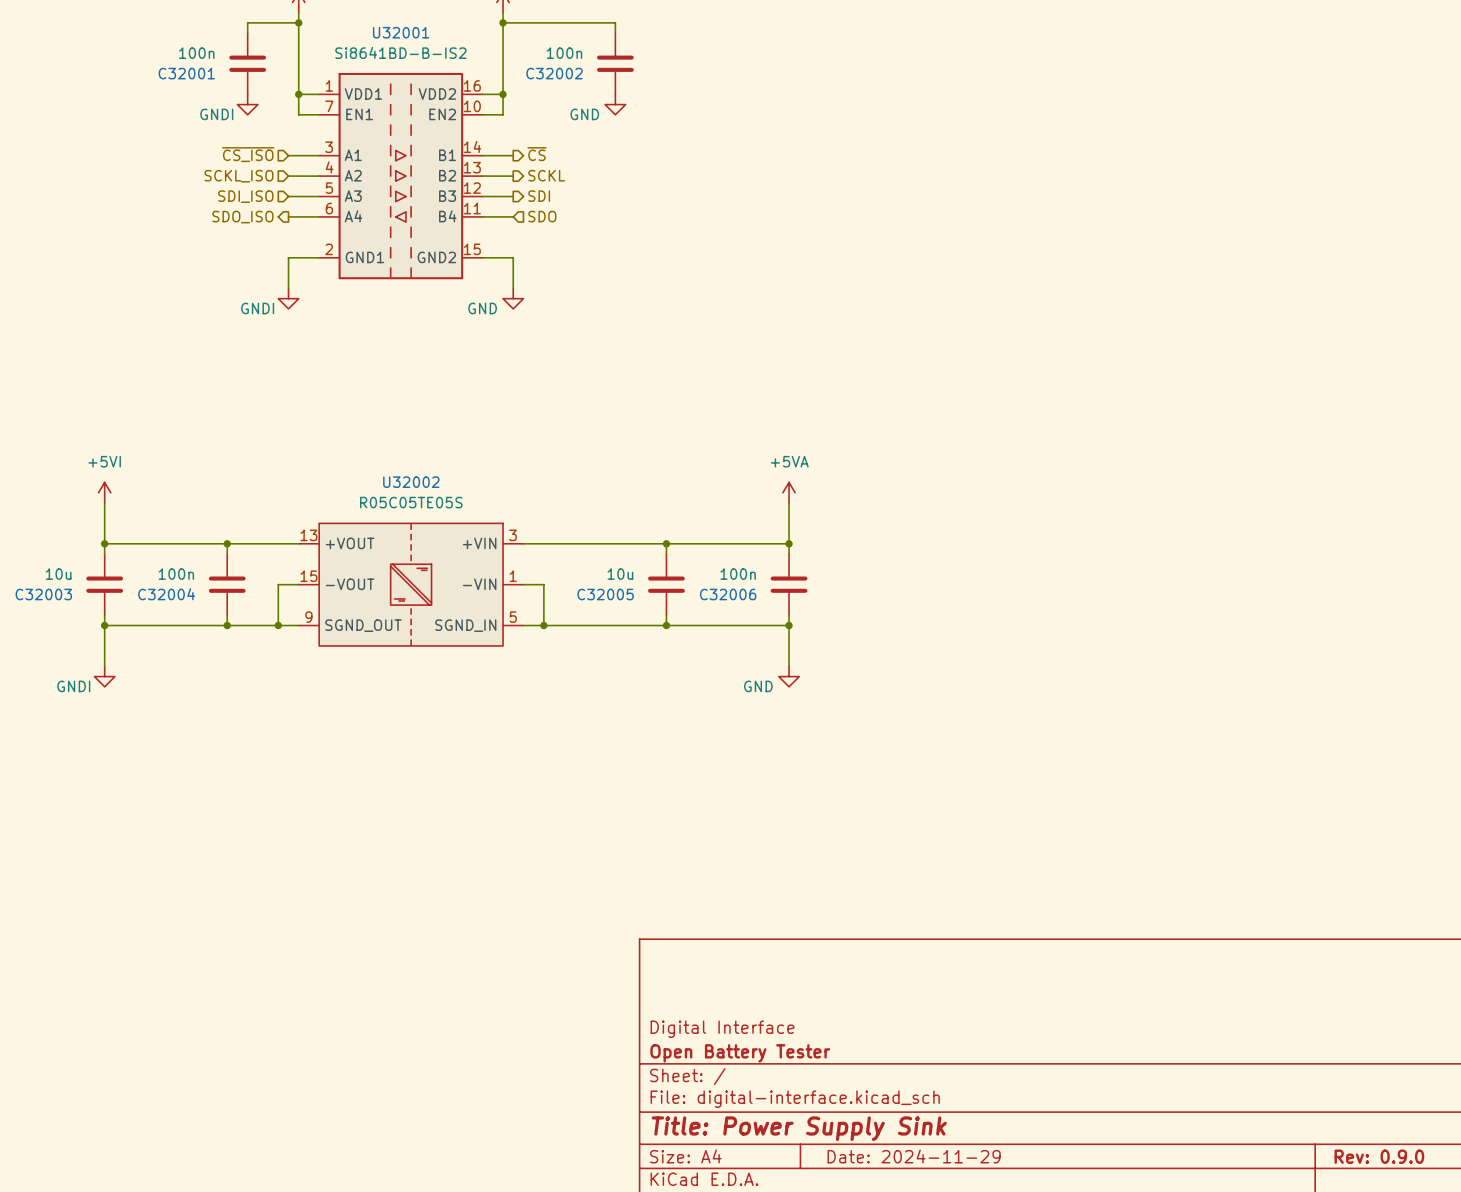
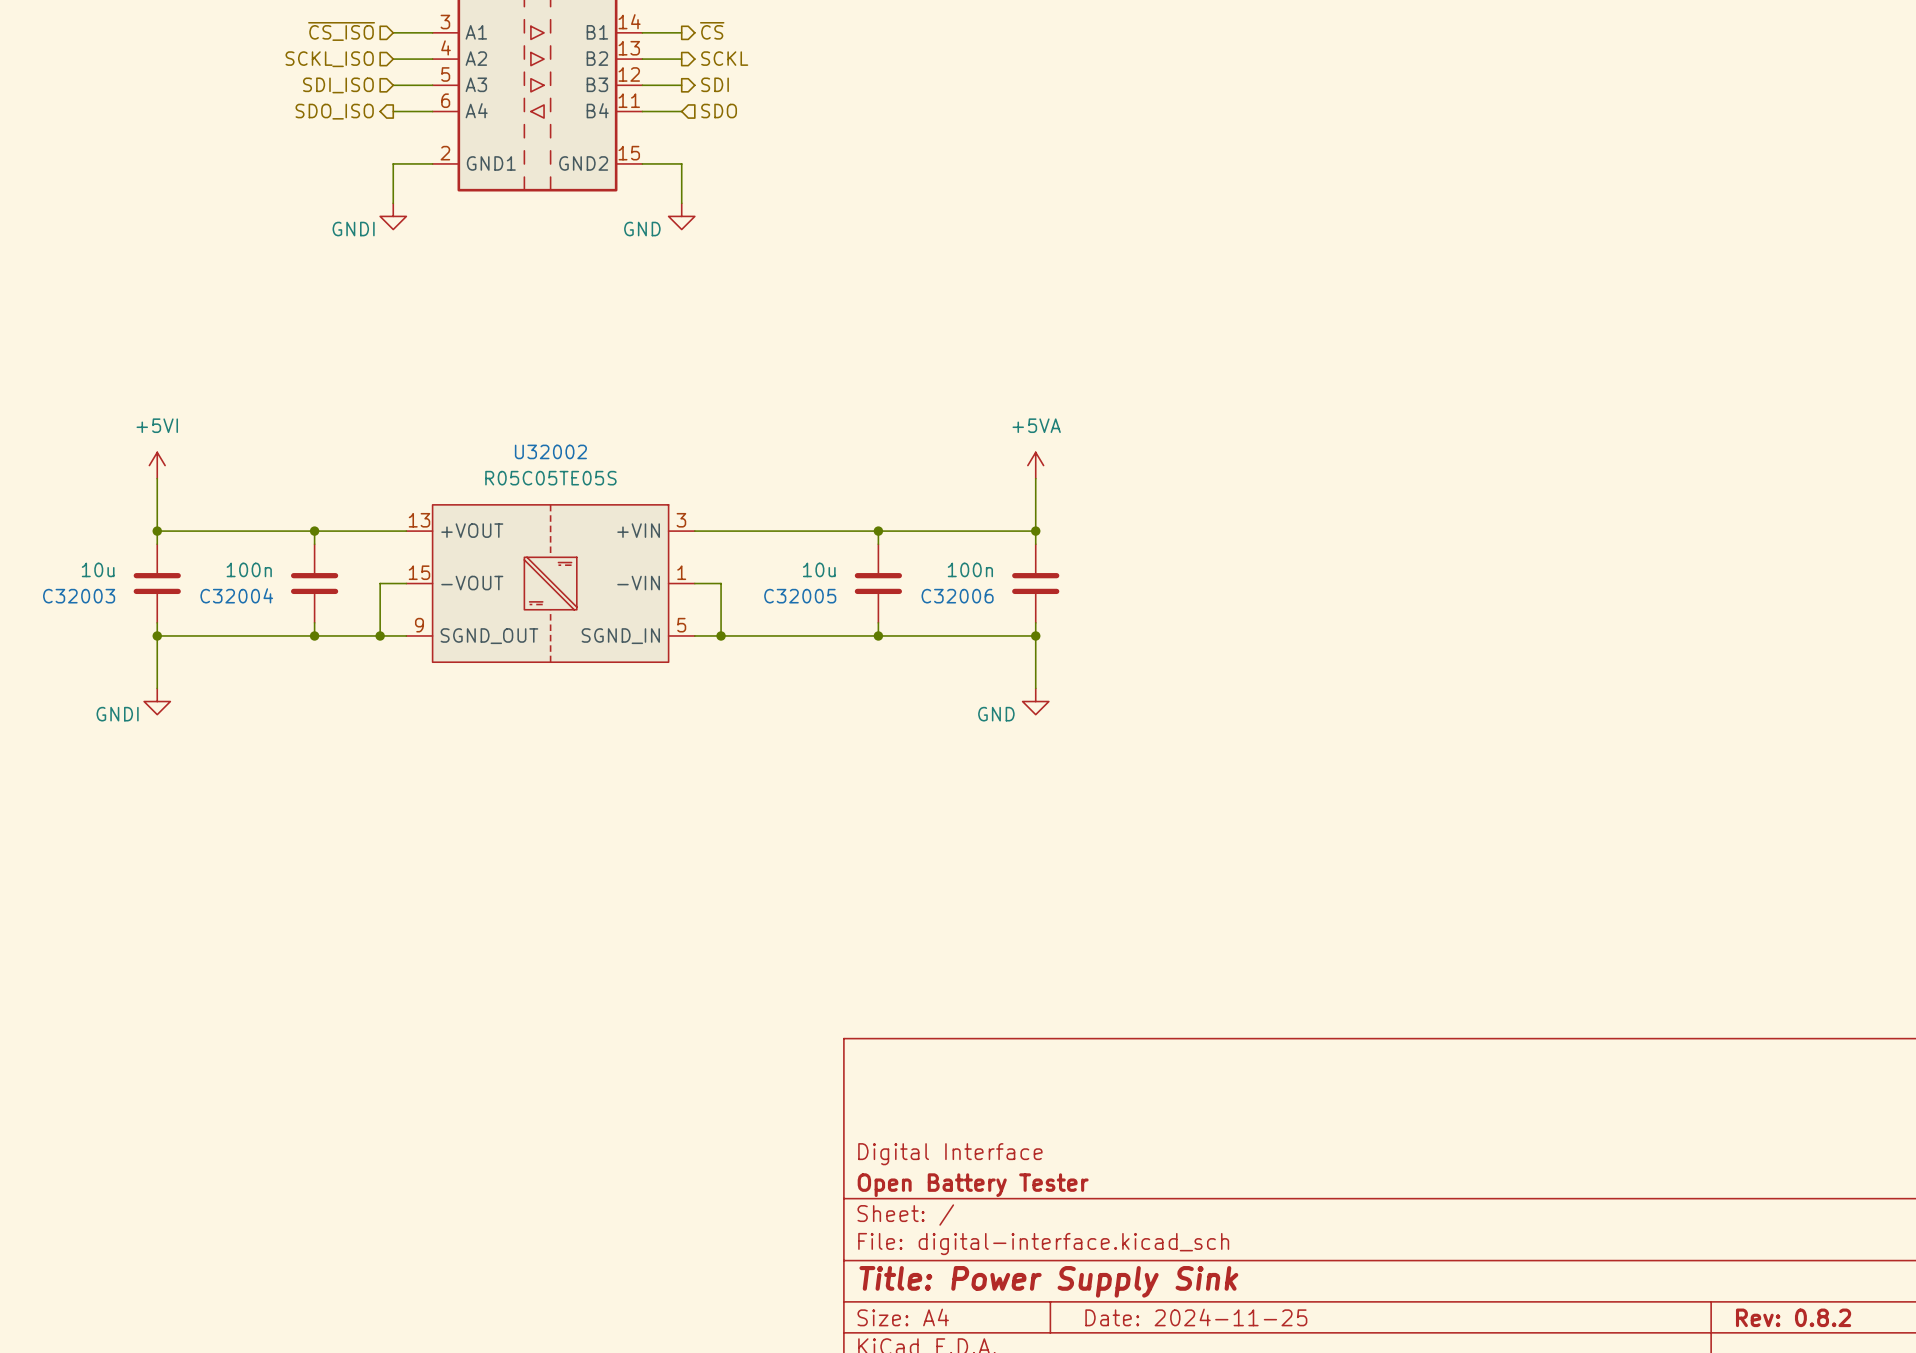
title block: Date: 2024-11-29 (914, 1156) -> Date: 2024-11-25 (1196, 1317)
title block: Rev: 0.9.0 (1379, 1156) -> Rev: 0.8.2 (1793, 1317)

